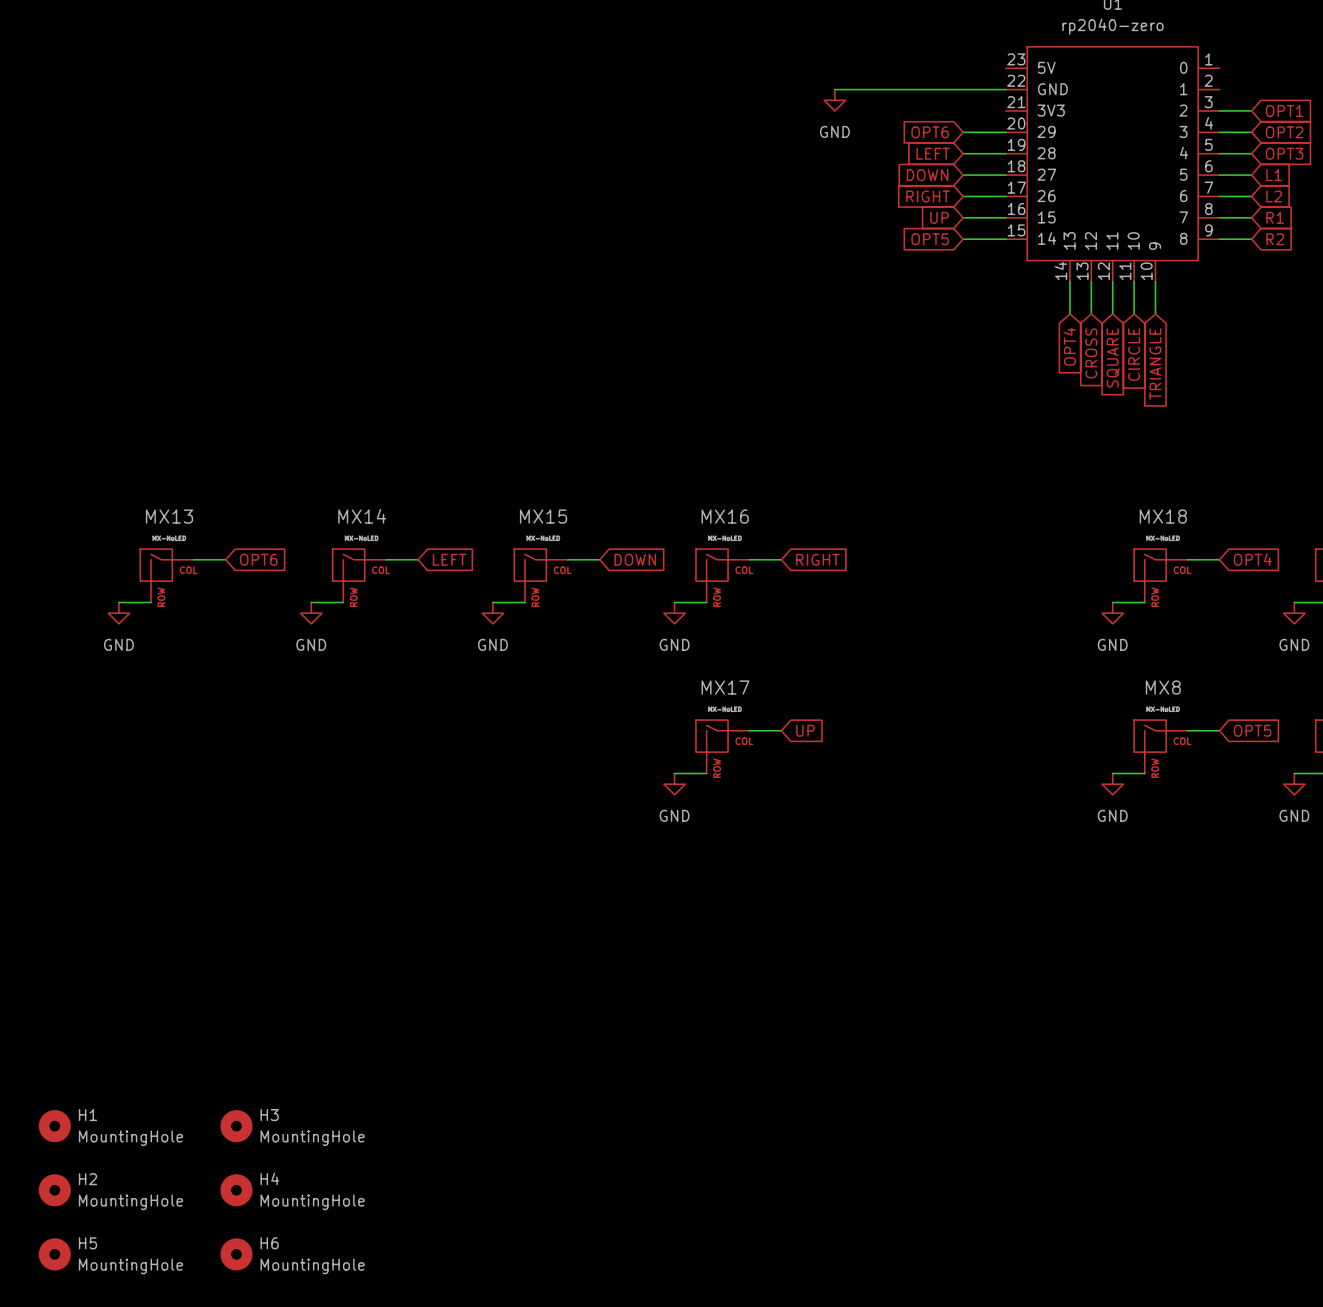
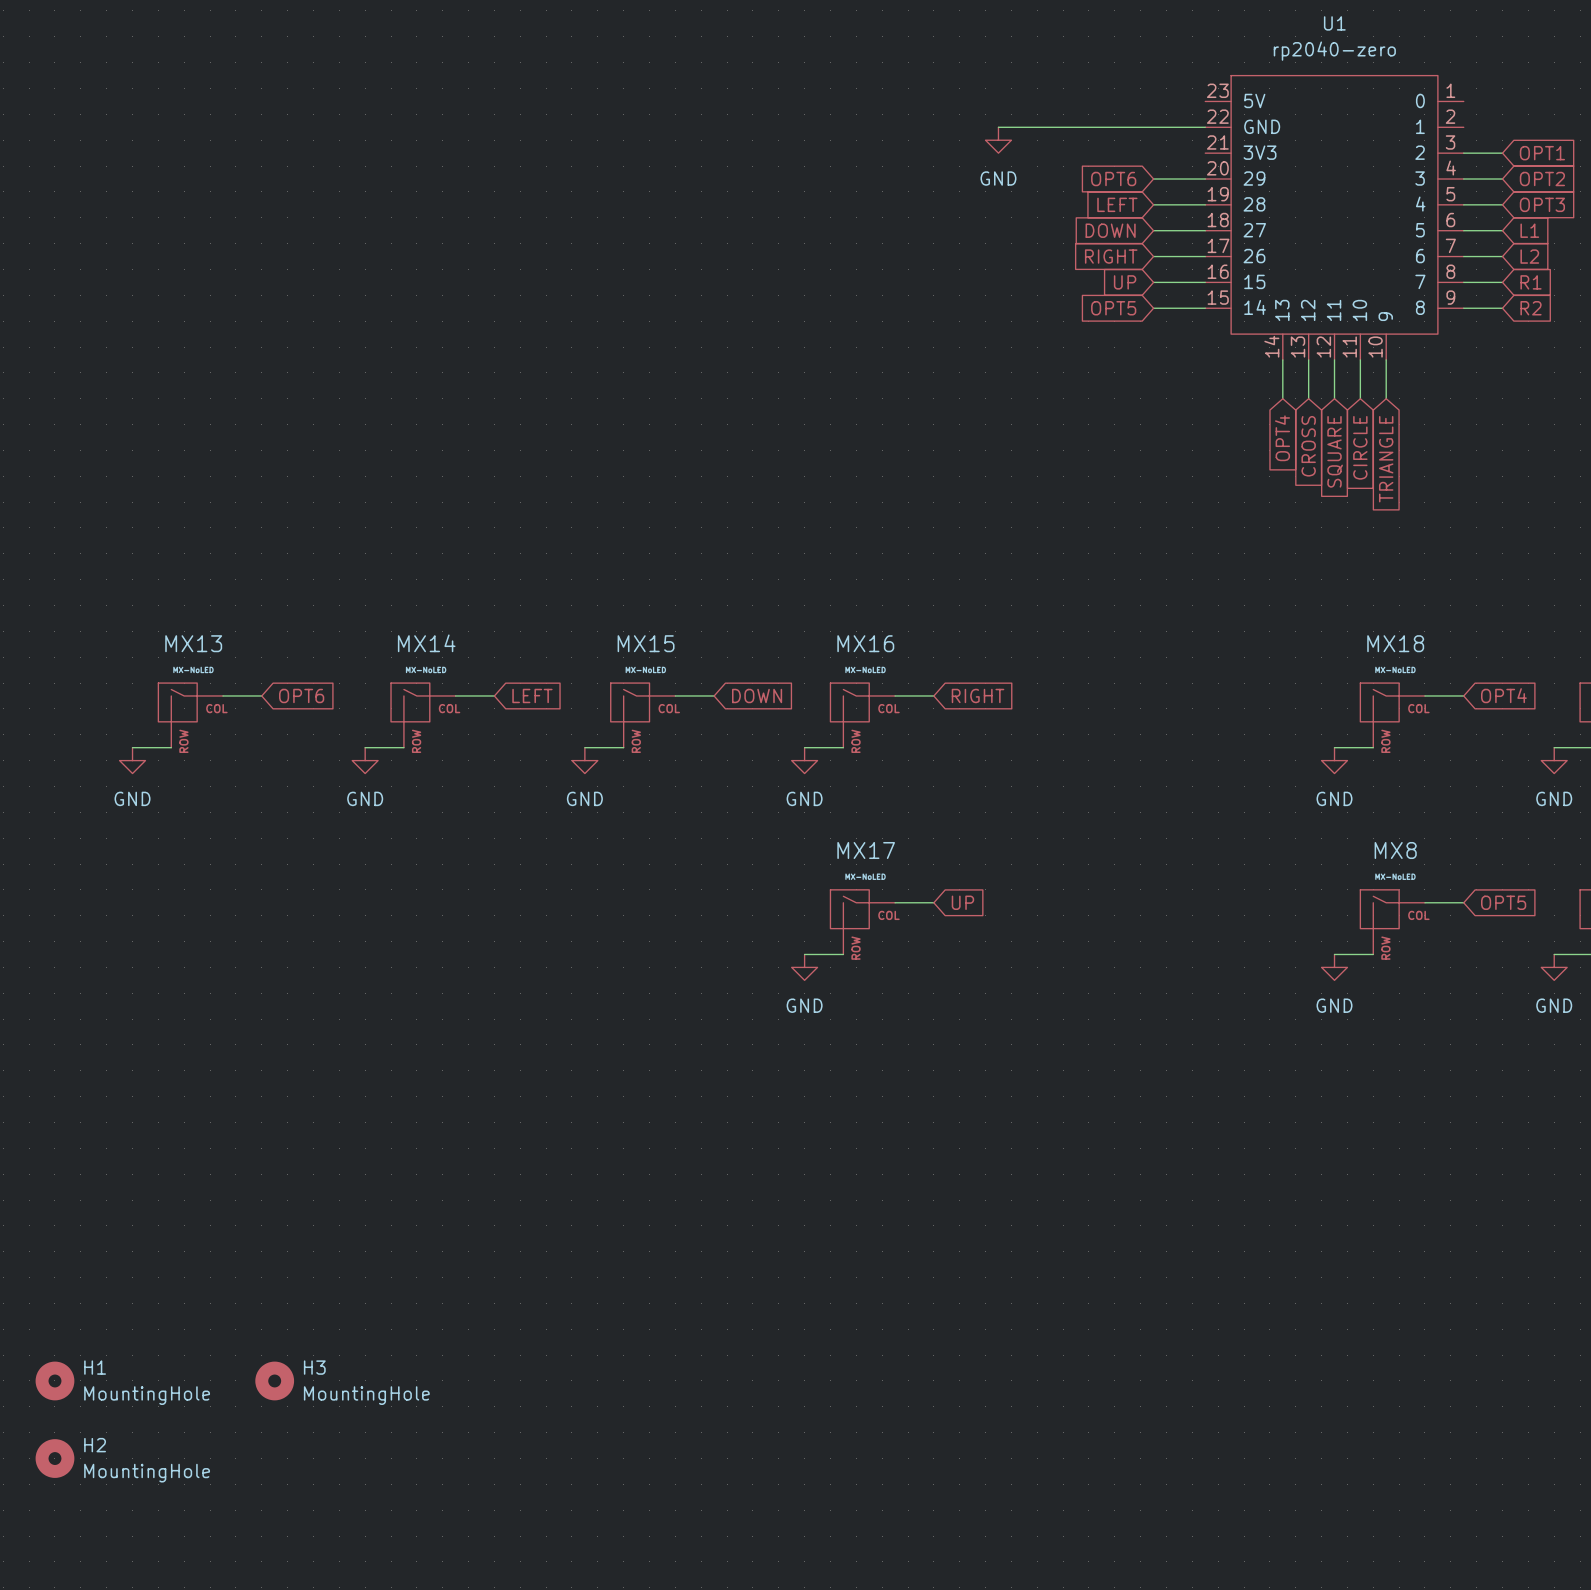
H4: MountingHole (236, 1190) -> none
H5: MountingHole (54, 1254) -> none
H6: MountingHole (236, 1254) -> none

